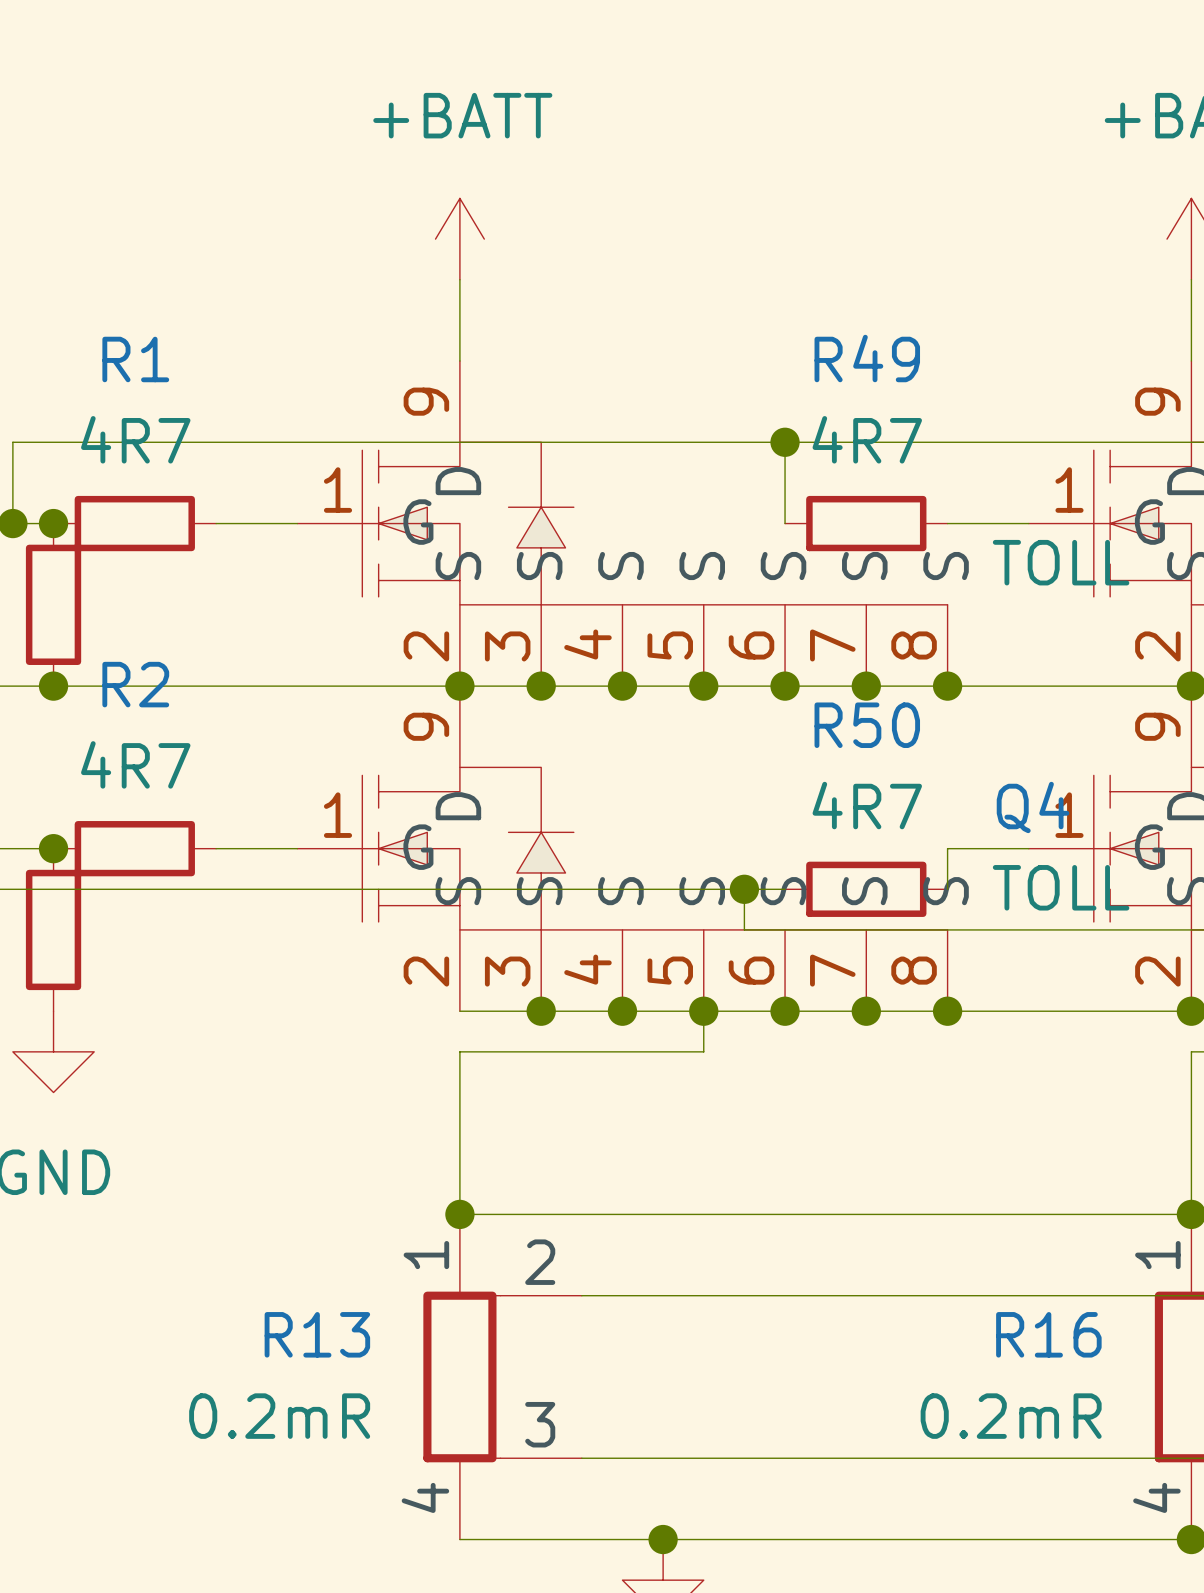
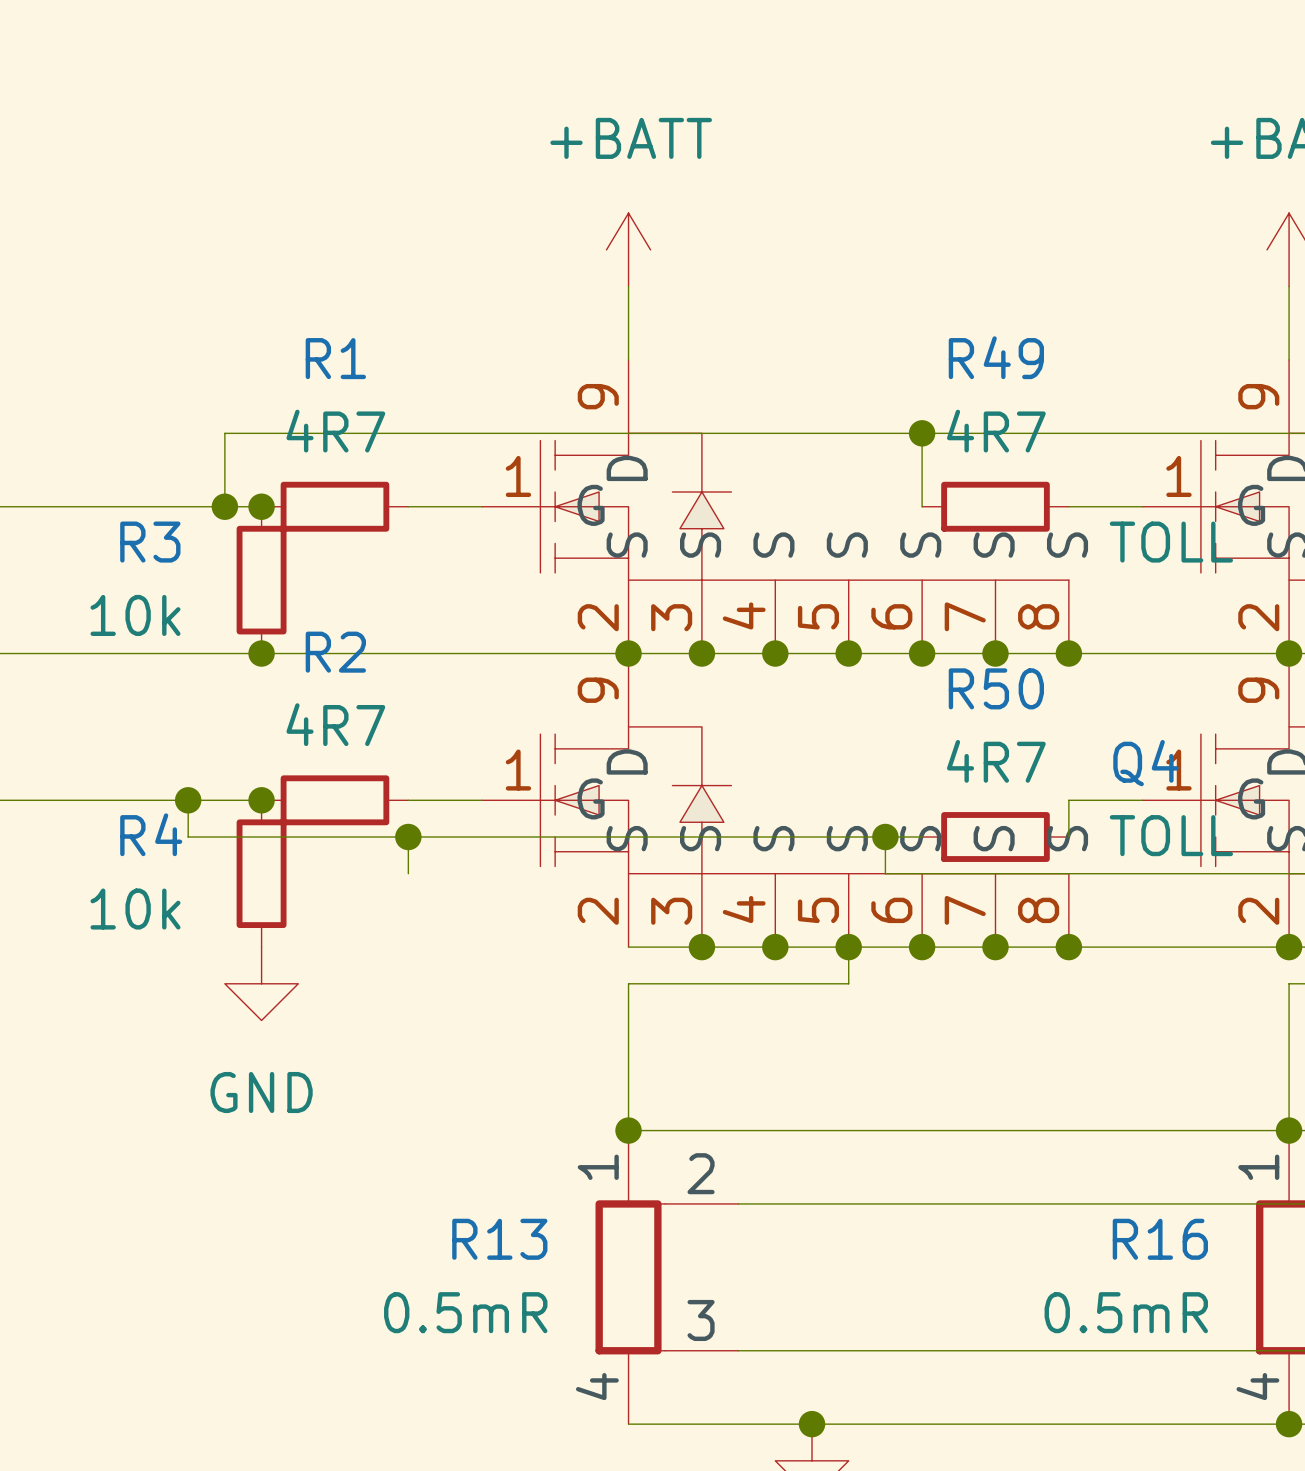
wire: none -> (408, 837) (408, 873)
junction: none -> (408, 837)
R13 value: 0.2mR (279, 1416) -> 0.5mR (465, 1312)
R16 value: 0.2mR (1011, 1416) -> 0.5mR (1126, 1312)

